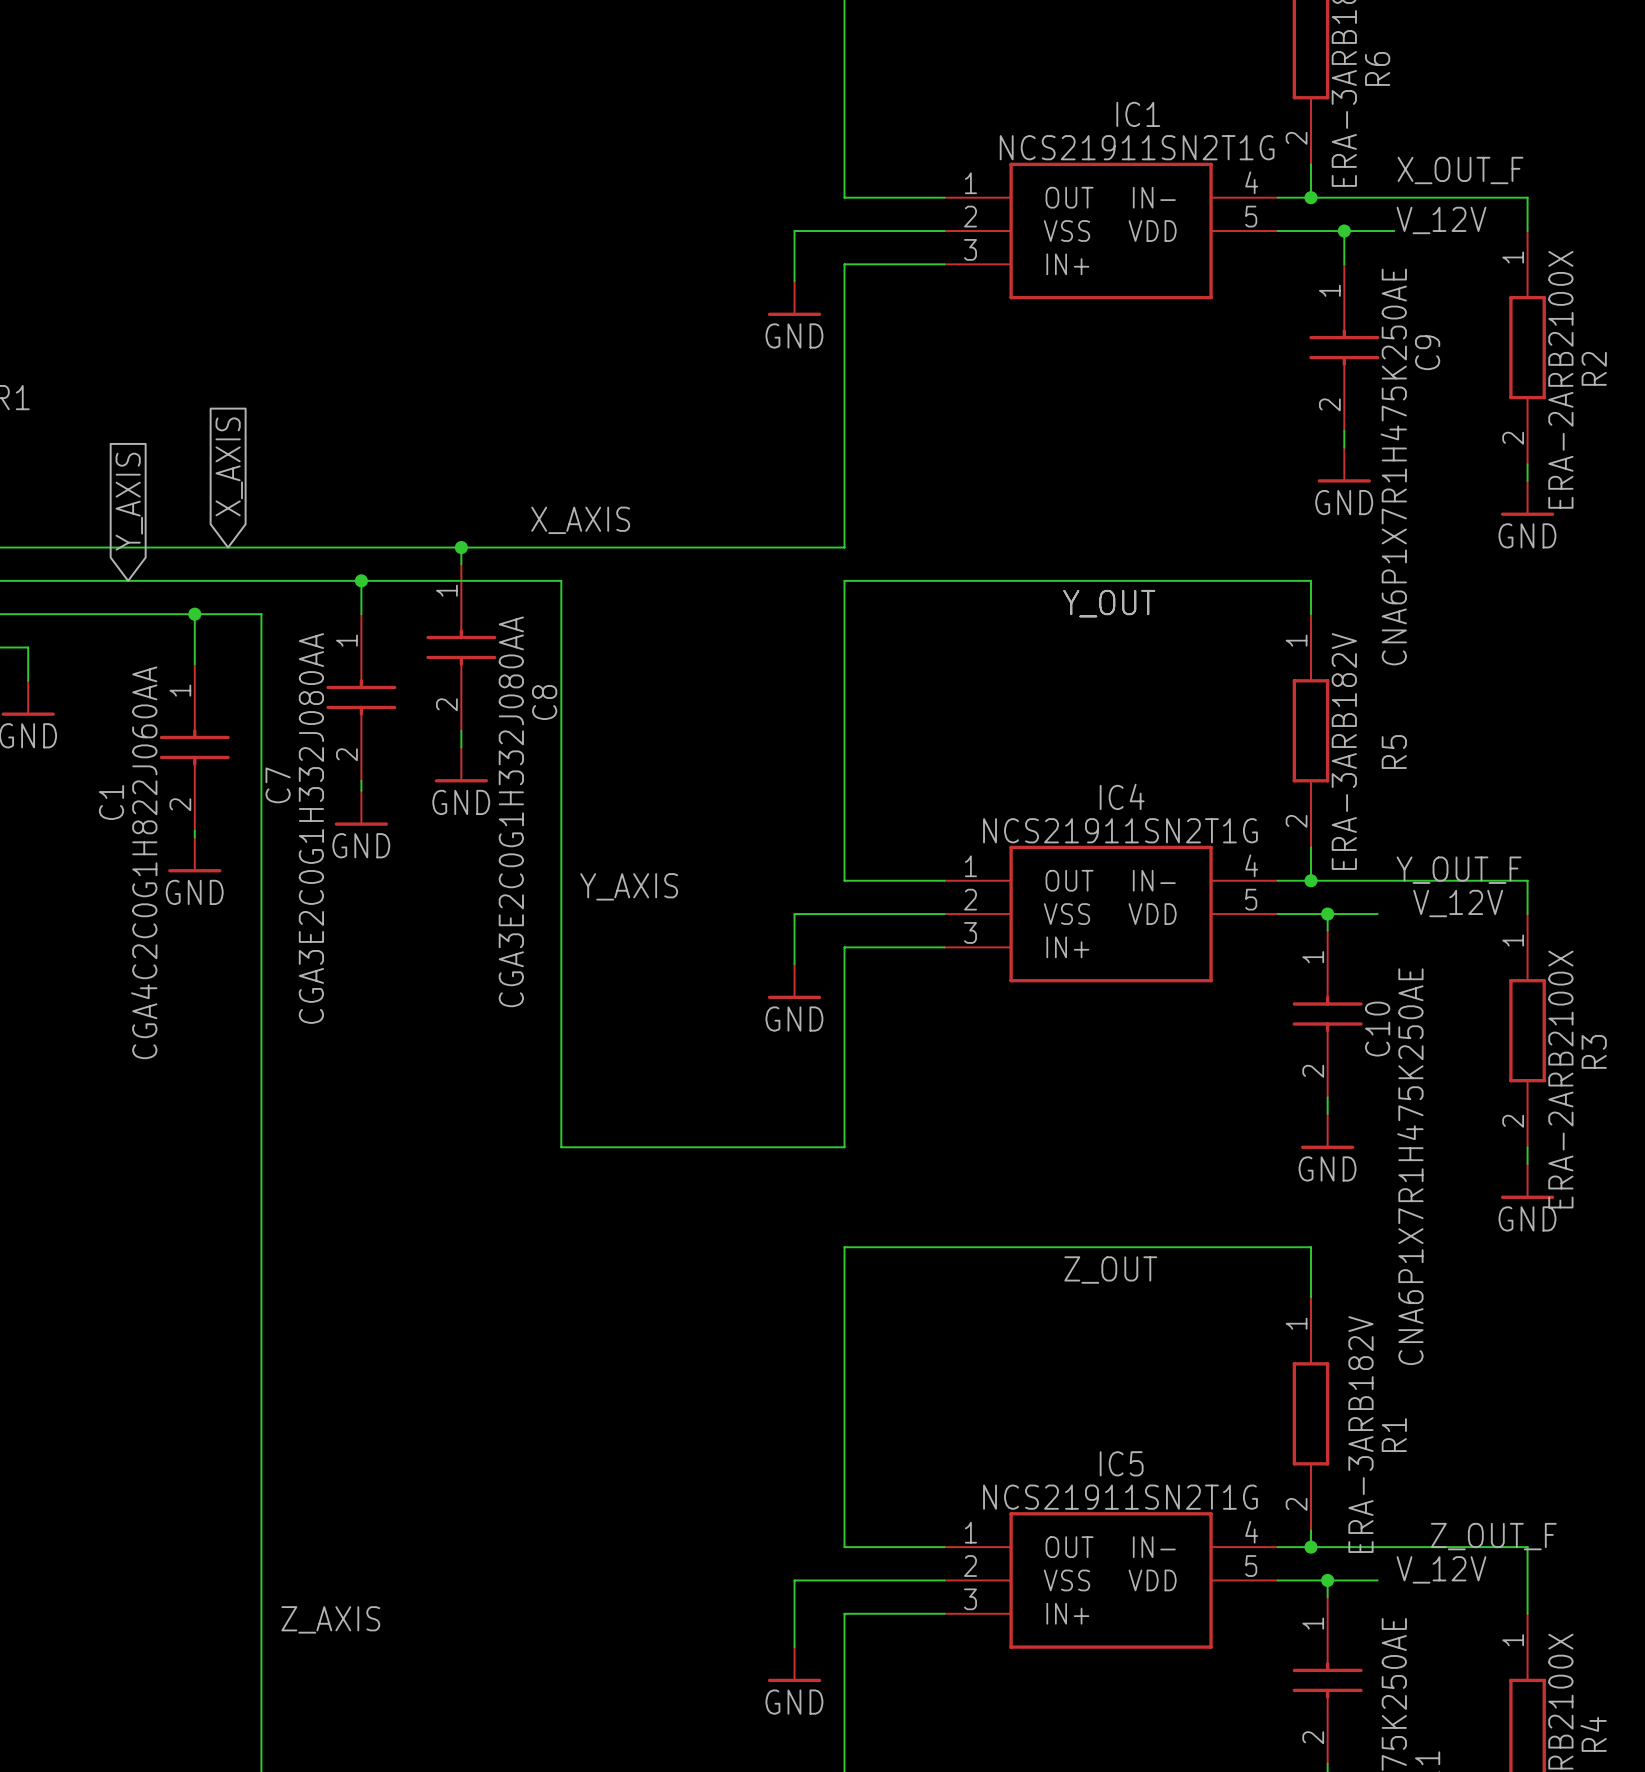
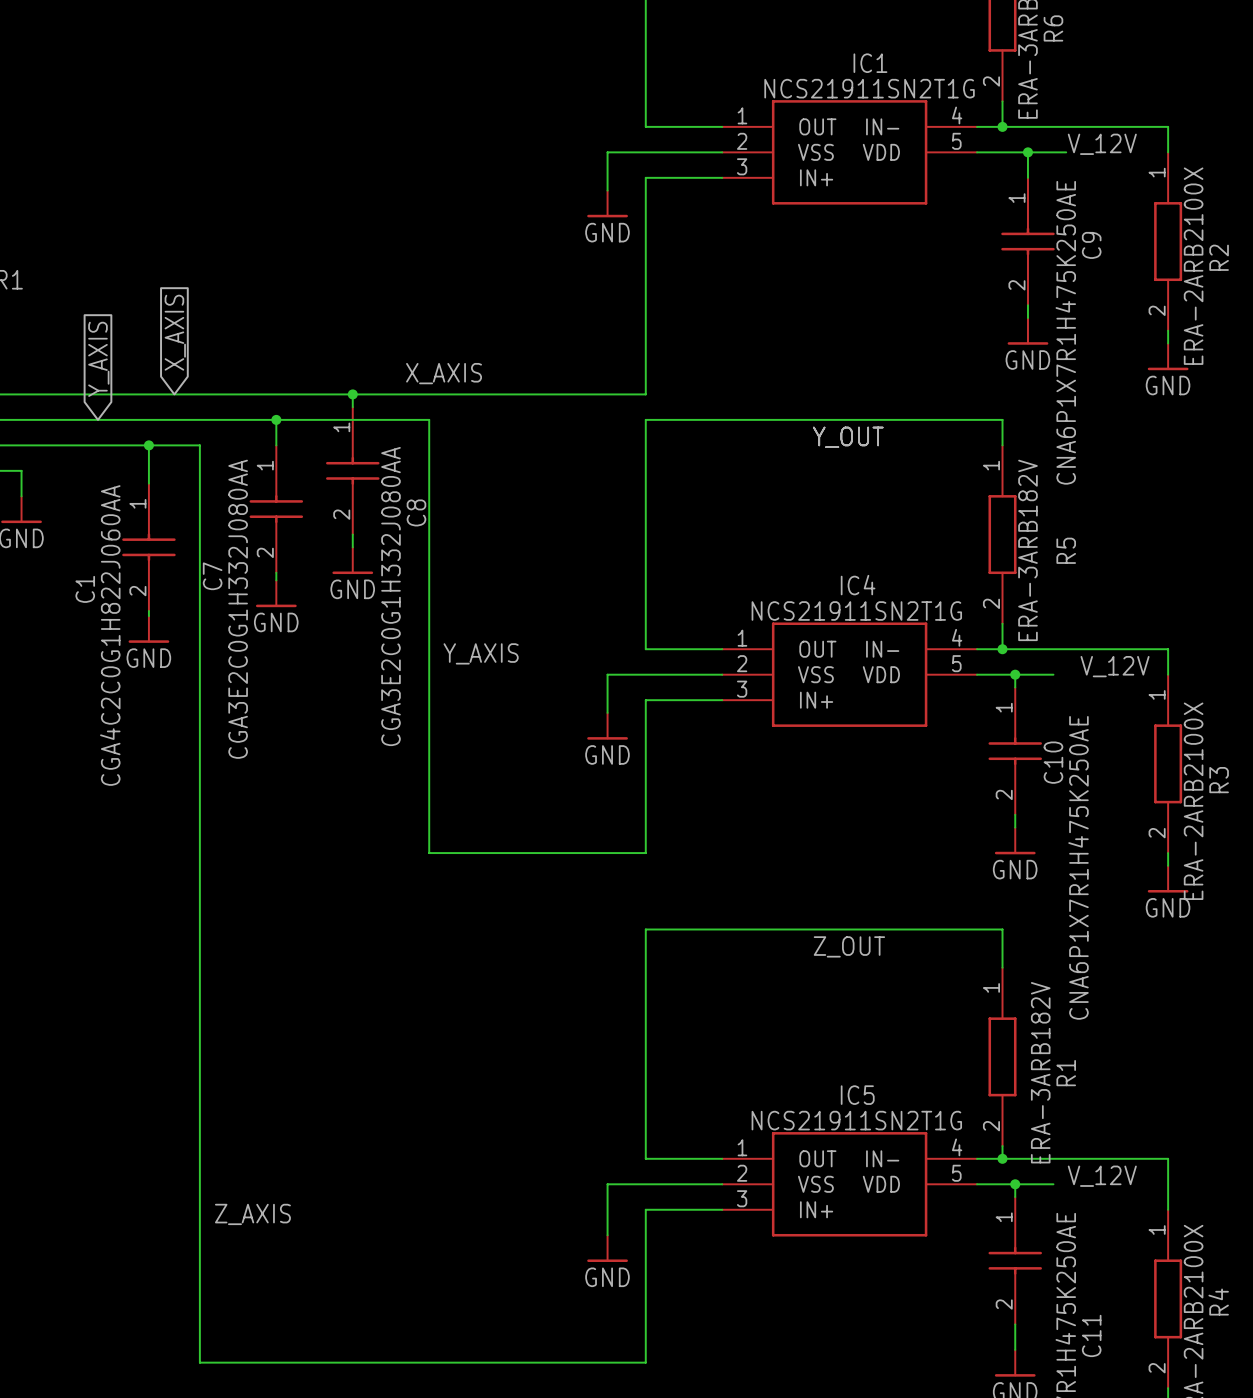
label: X_OUT_F (1460, 170) -> none
label: Y_OUT_F (1458, 870) -> none
label: Z_OUT_F (1493, 1536) -> none

